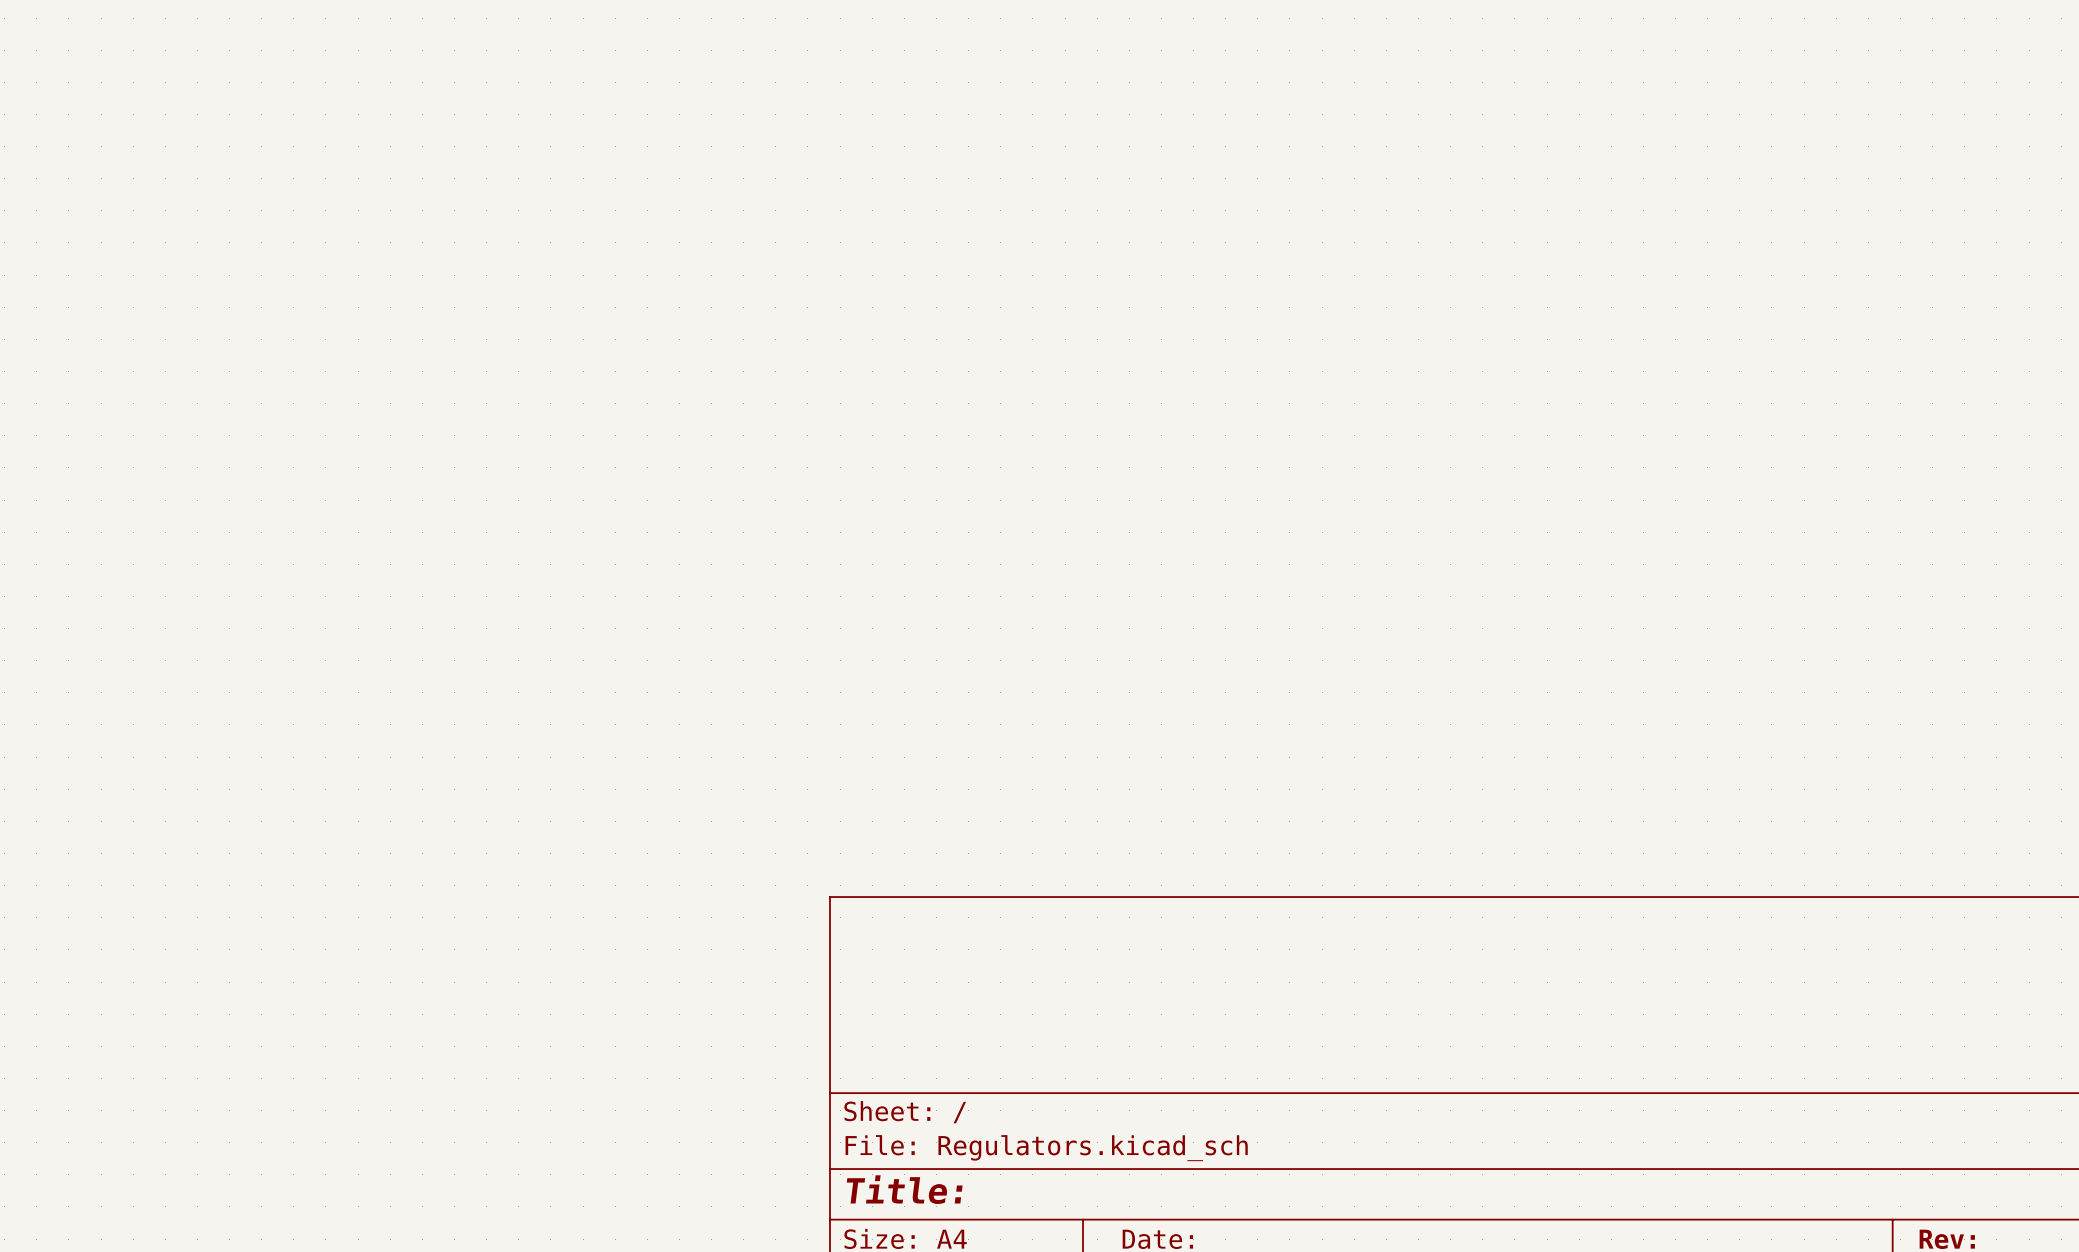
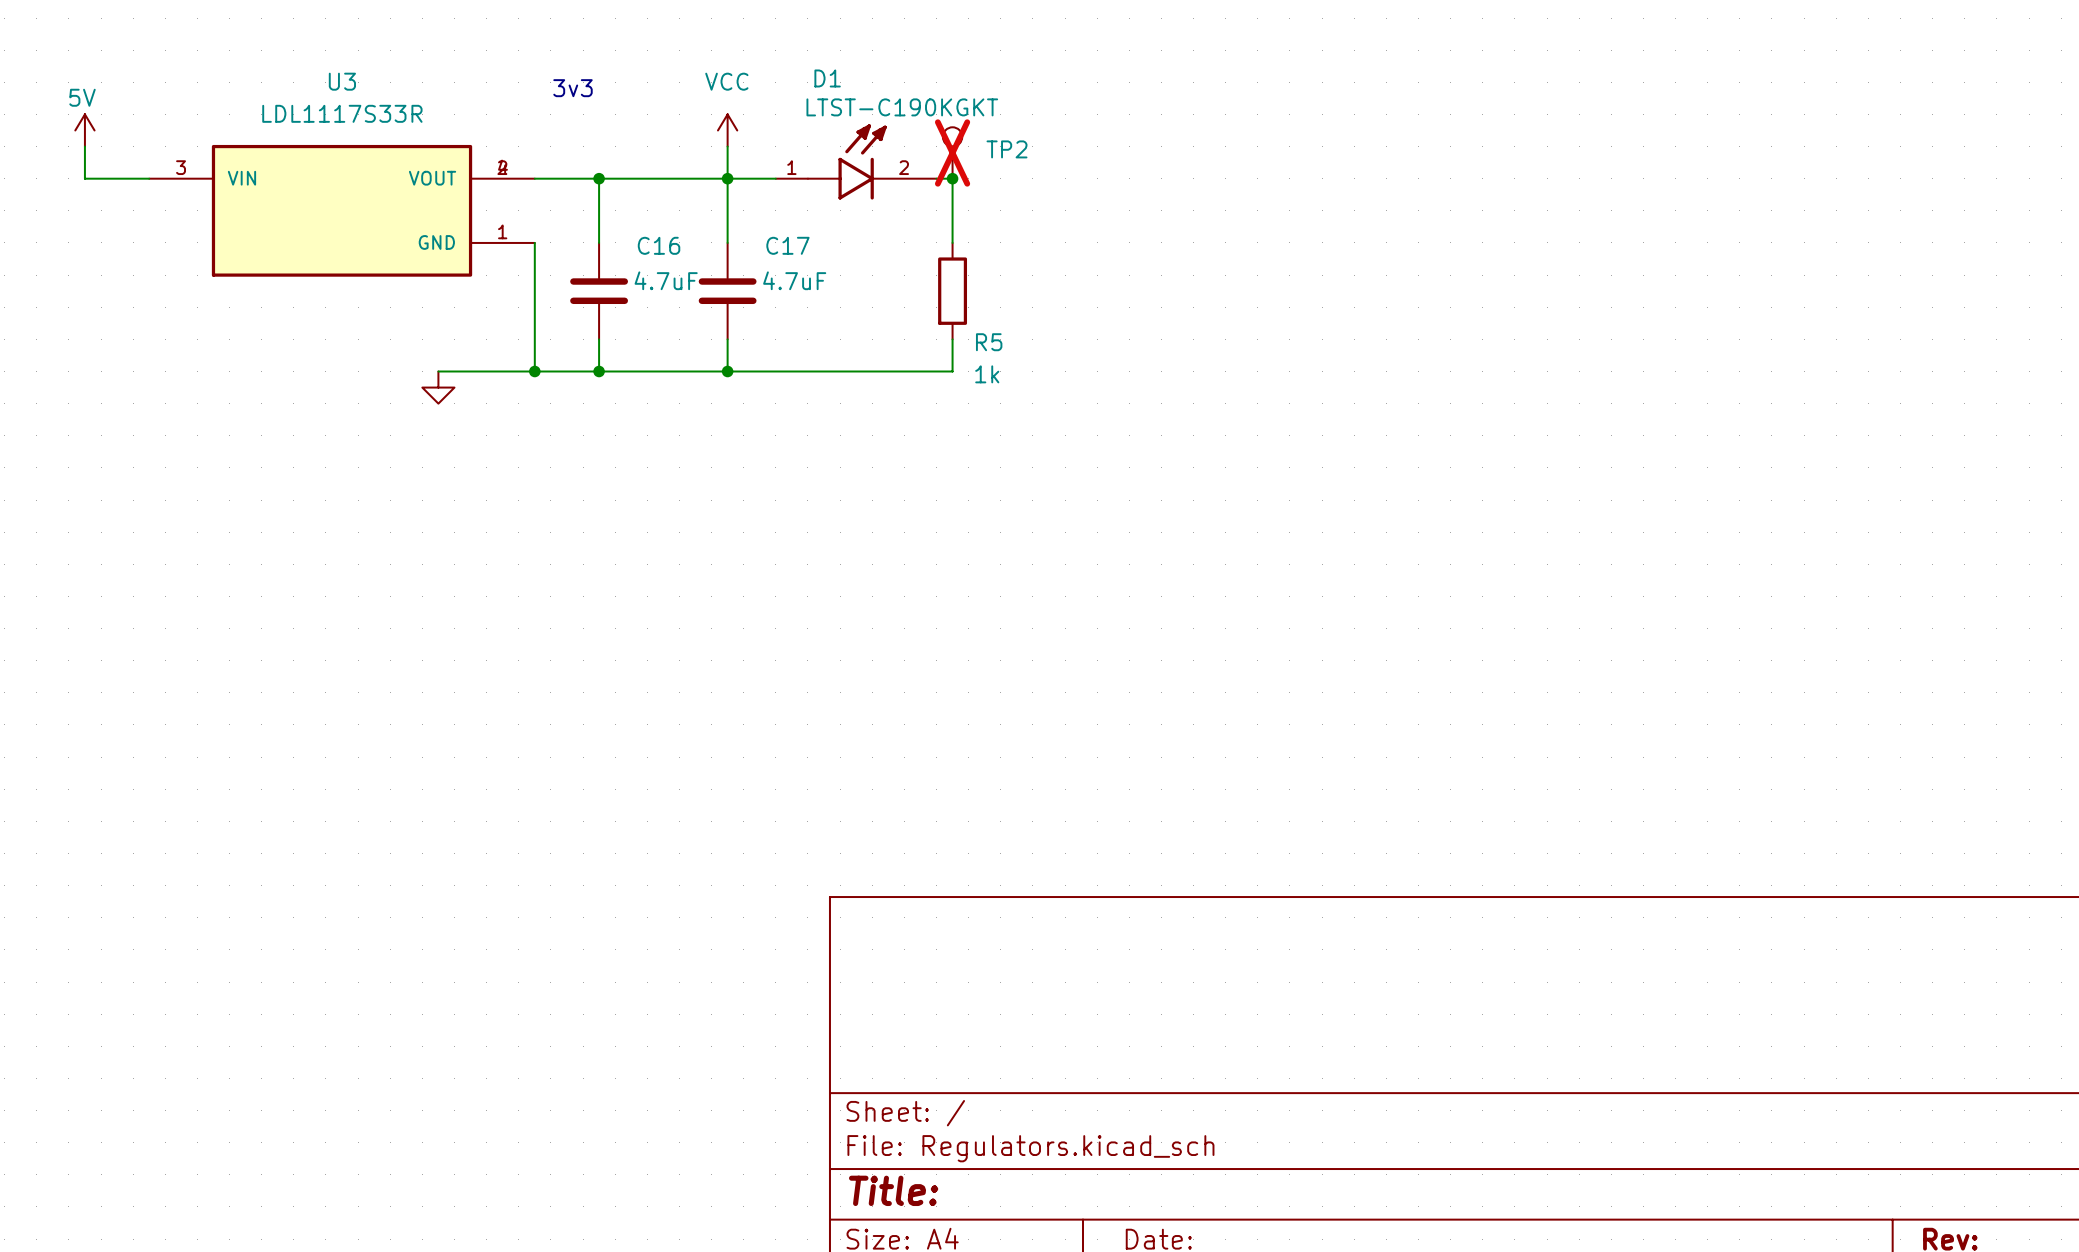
text: none -> 3v3 (572, 88)
power symbol: none -> 5V (84, 130)
power symbol: none -> VCC (727, 130)
wire: none -> (84, 146) (84, 178) (149, 178)
wire: none -> (727, 146) (727, 242)
TP2: none -> (952, 152)
D1: none -> LTST-C190KGKT (856, 161)
wire: none -> (534, 178) (775, 178)
wire: none -> (599, 178) (599, 242)
junction: none -> (599, 178)
junction: none -> (727, 178)
wire: none -> (936, 178) (952, 178) (952, 242)
junction: none -> (952, 178)
U3: none -> LDL1117S33R (342, 210)
wire: none -> (534, 242) (534, 371)
C16: none -> (599, 291)
C17: none -> (727, 291)
R5: none -> 1k (952, 291)
wire: none -> (599, 339) (599, 371)
wire: none -> (727, 339) (727, 371)
wire: none -> (952, 339) (952, 371) (438, 371)
junction: none -> (534, 371)
junction: none -> (599, 371)
junction: none -> (727, 371)
power symbol: none -> (438, 387)

